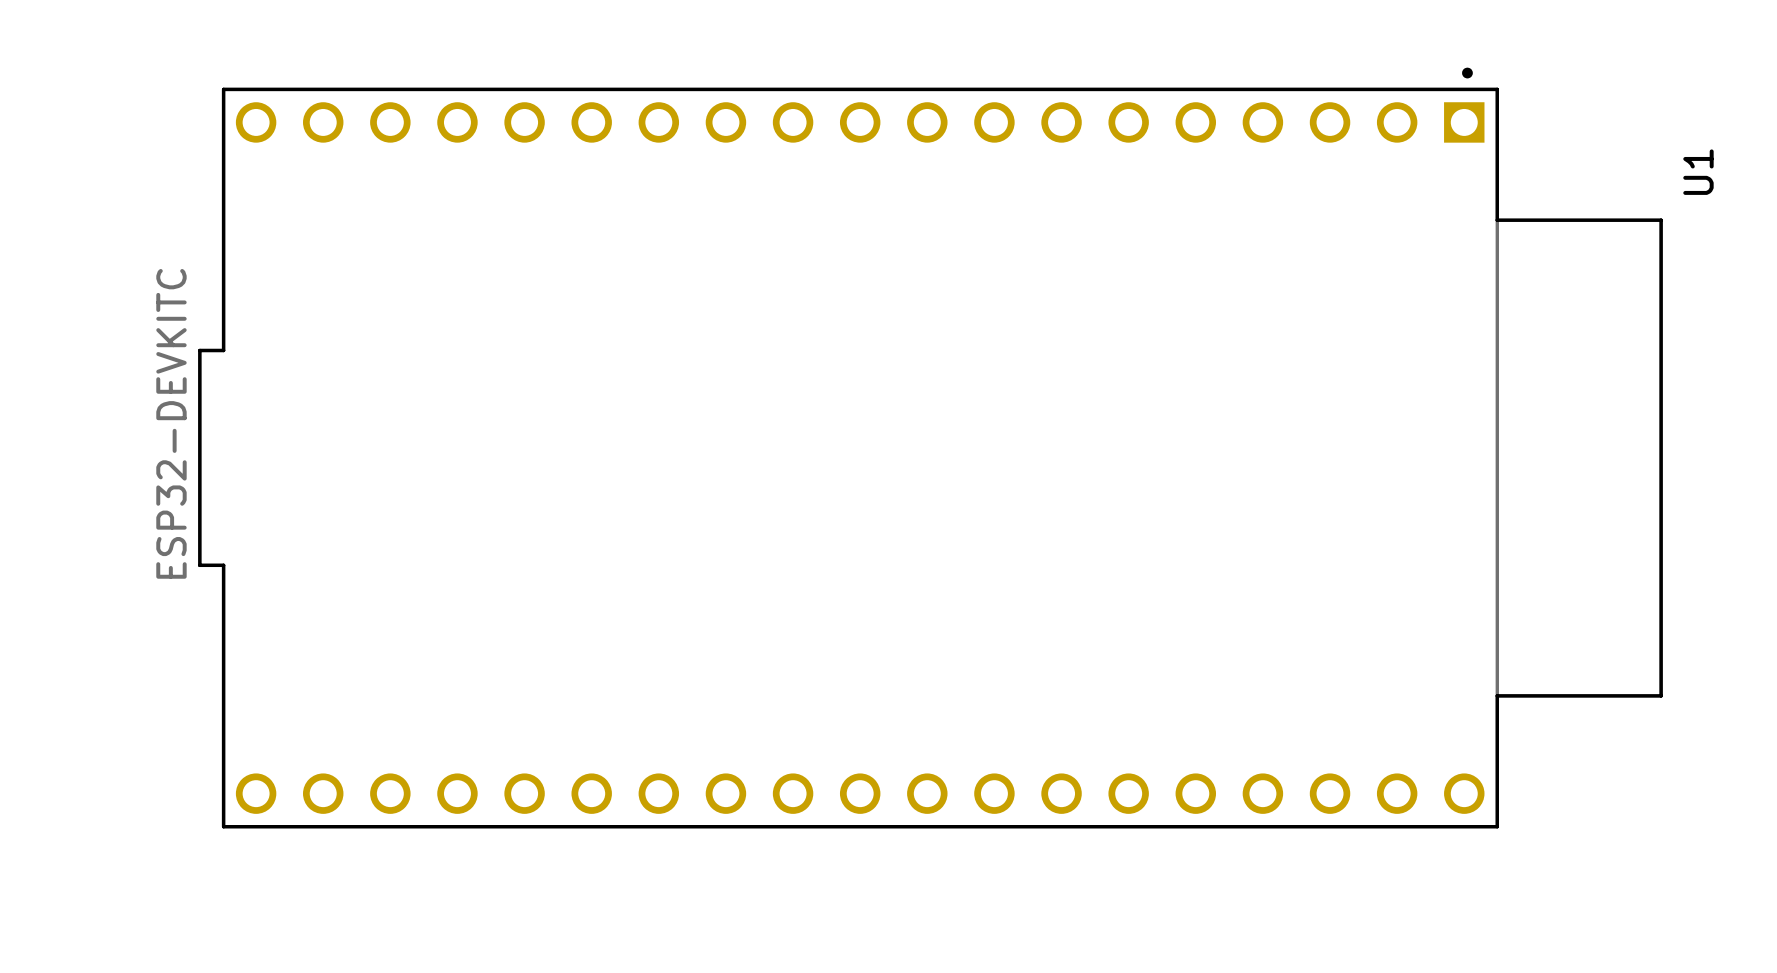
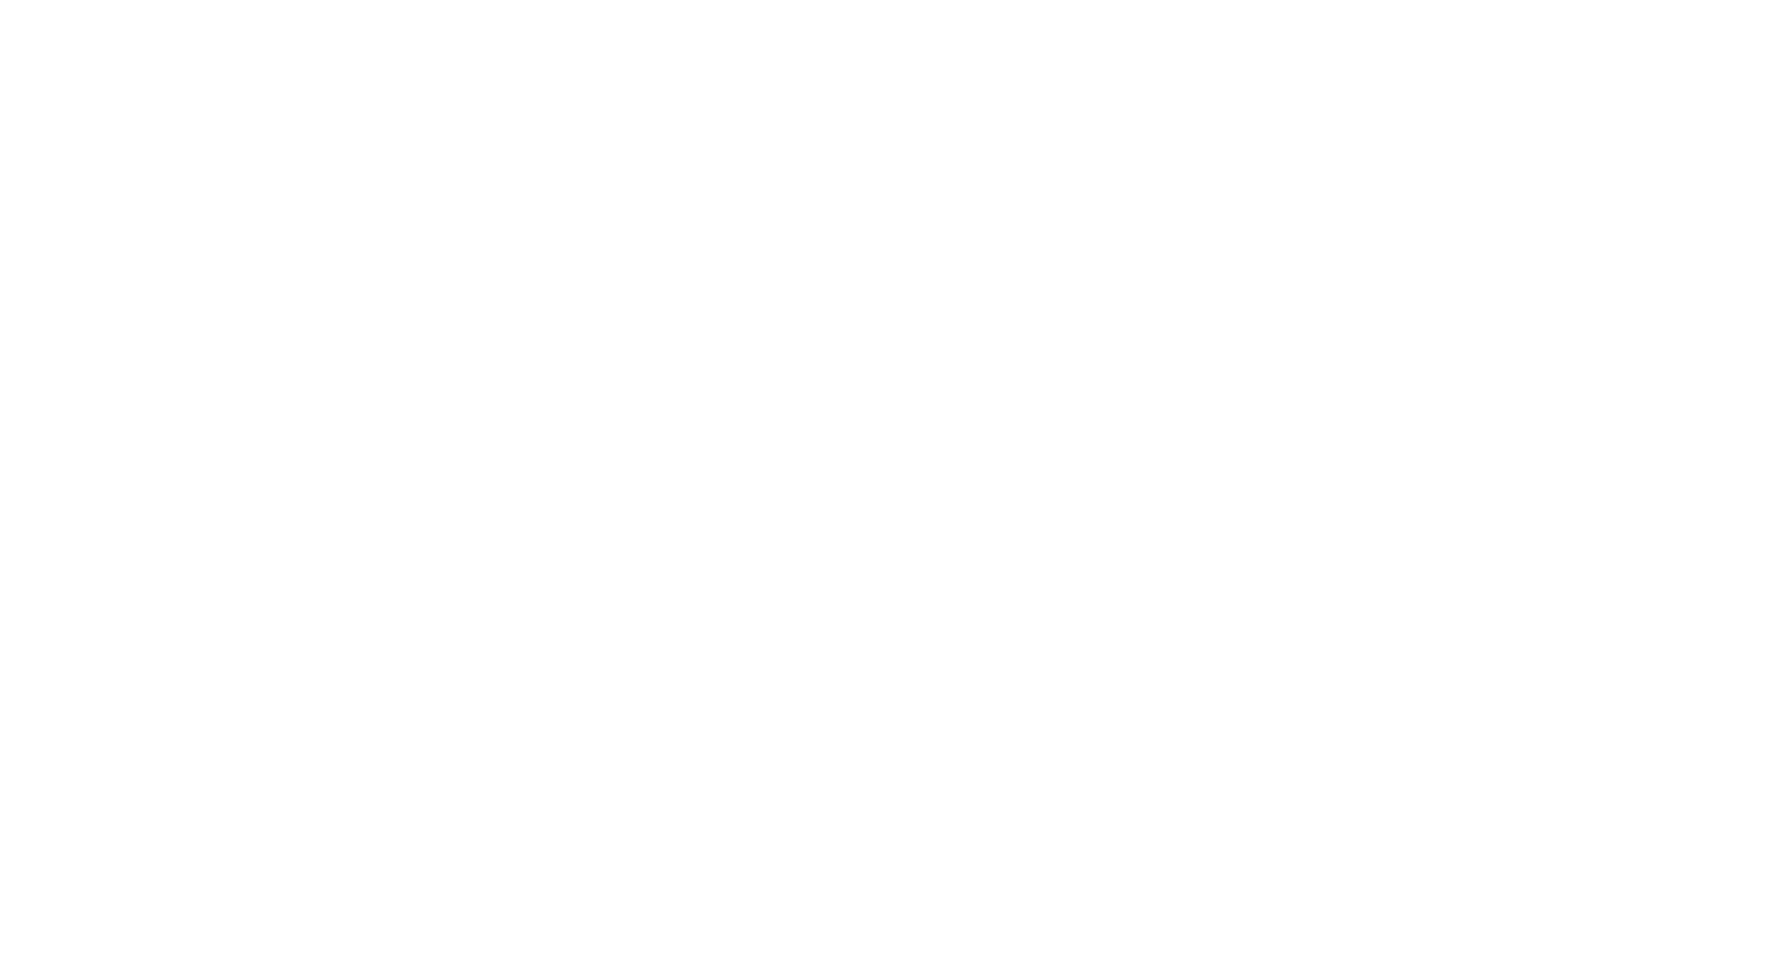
U1: ESP32-DEVKITC (930, 448) -> none

